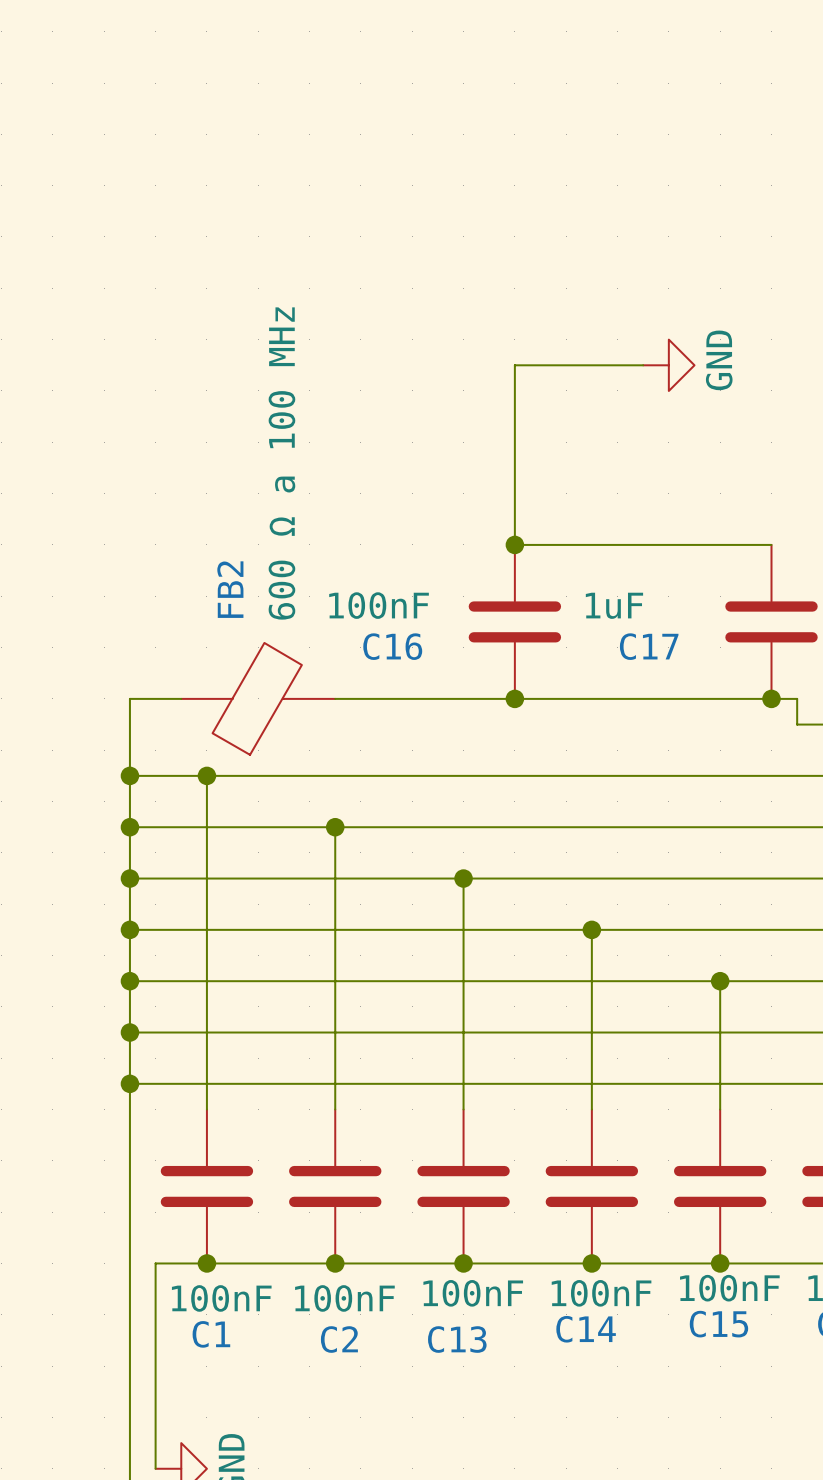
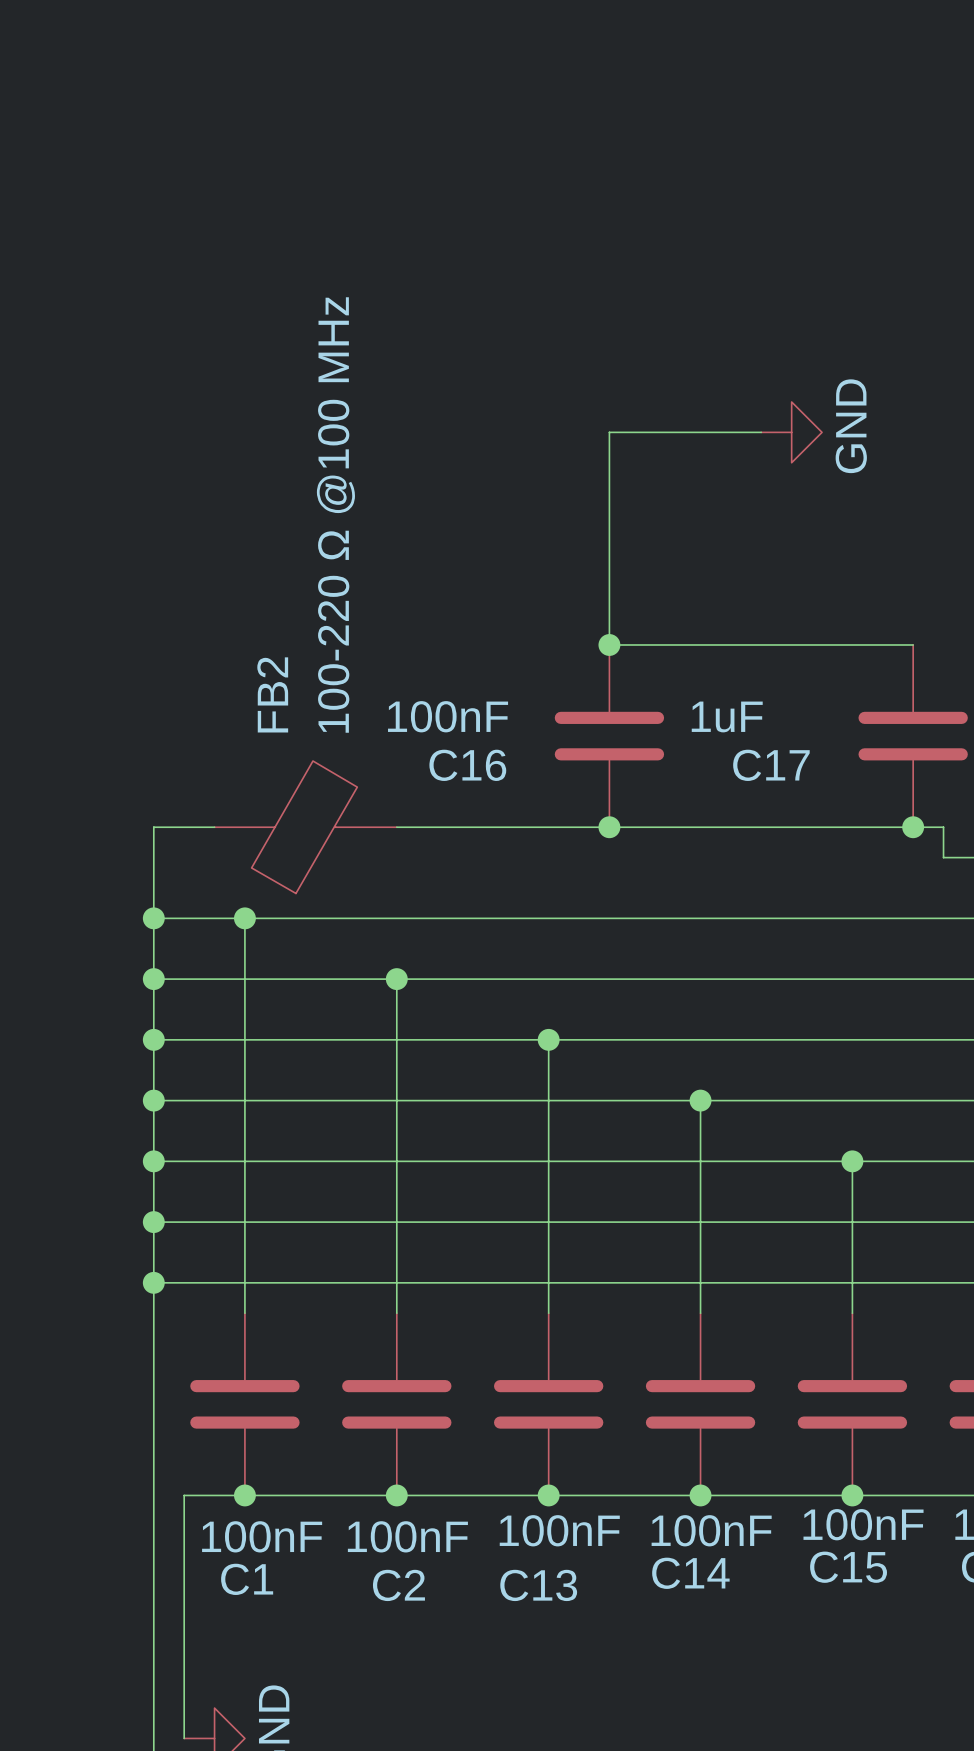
FB2 value: 600 Ω a 100 MHz (281, 463) -> 100-220 Ω @100 MHz (335, 515)

